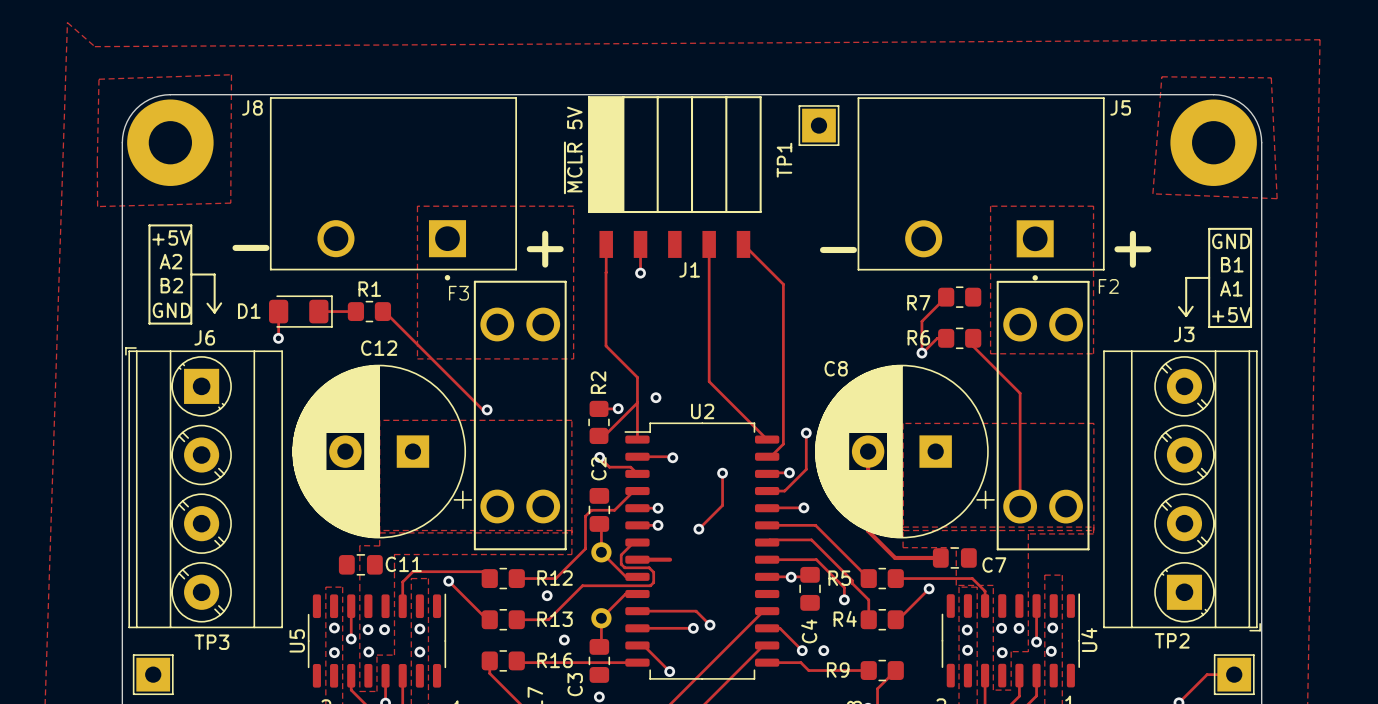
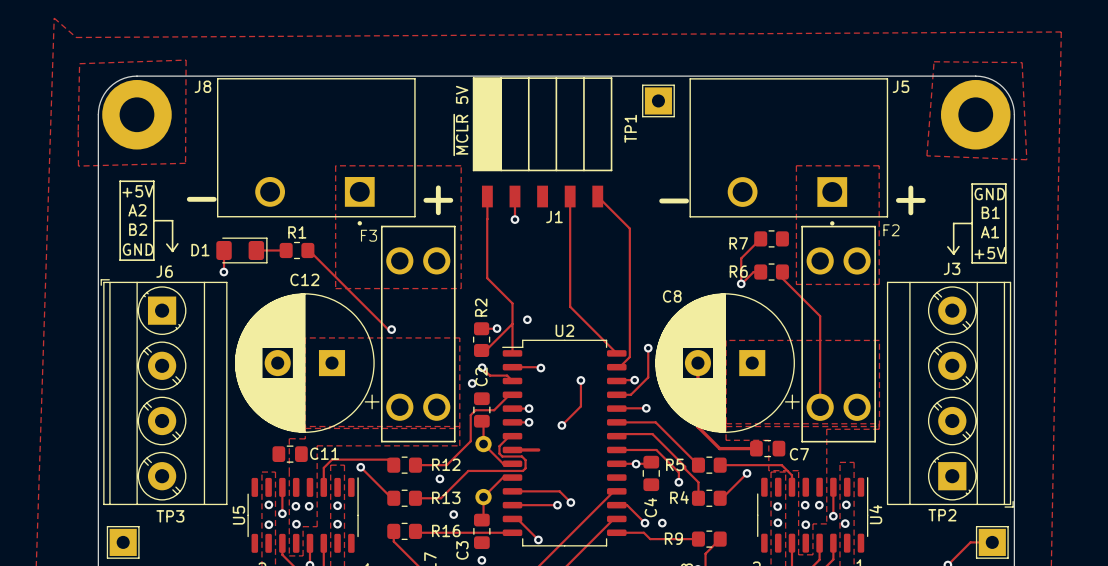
via: none -> (472, 383)

